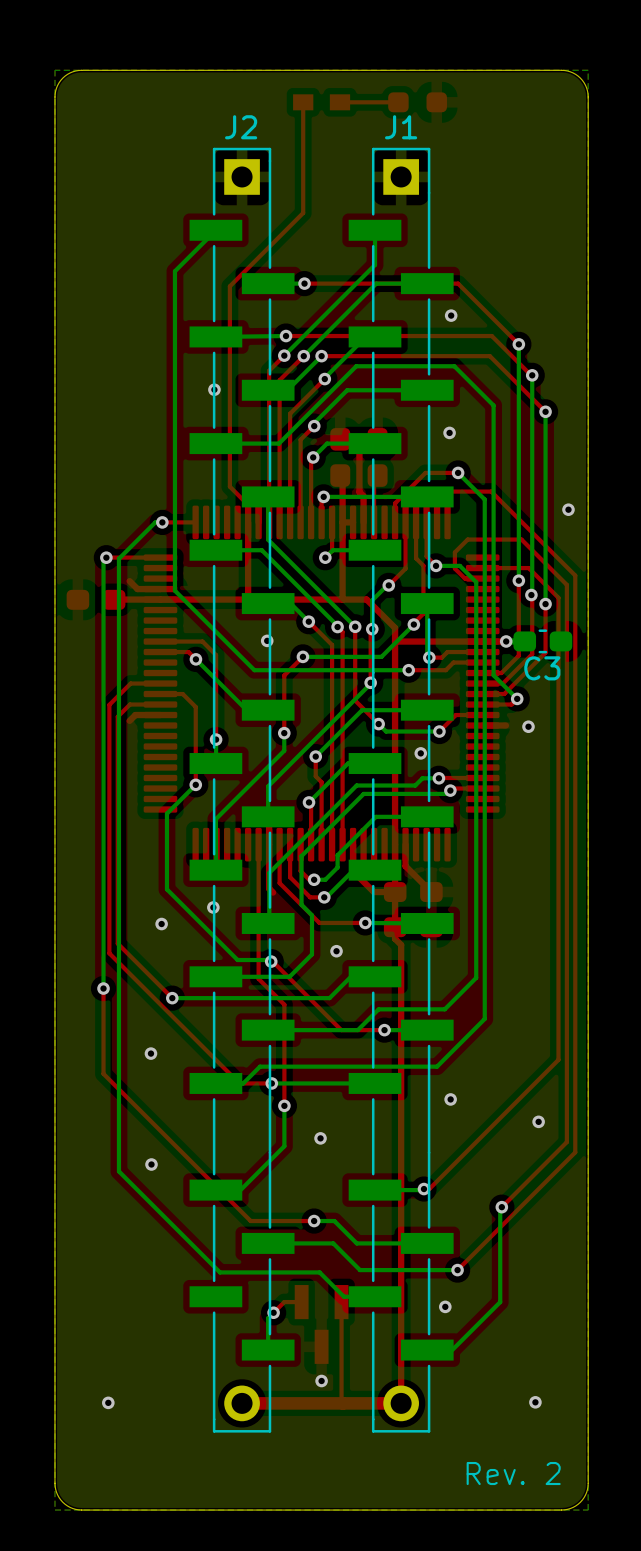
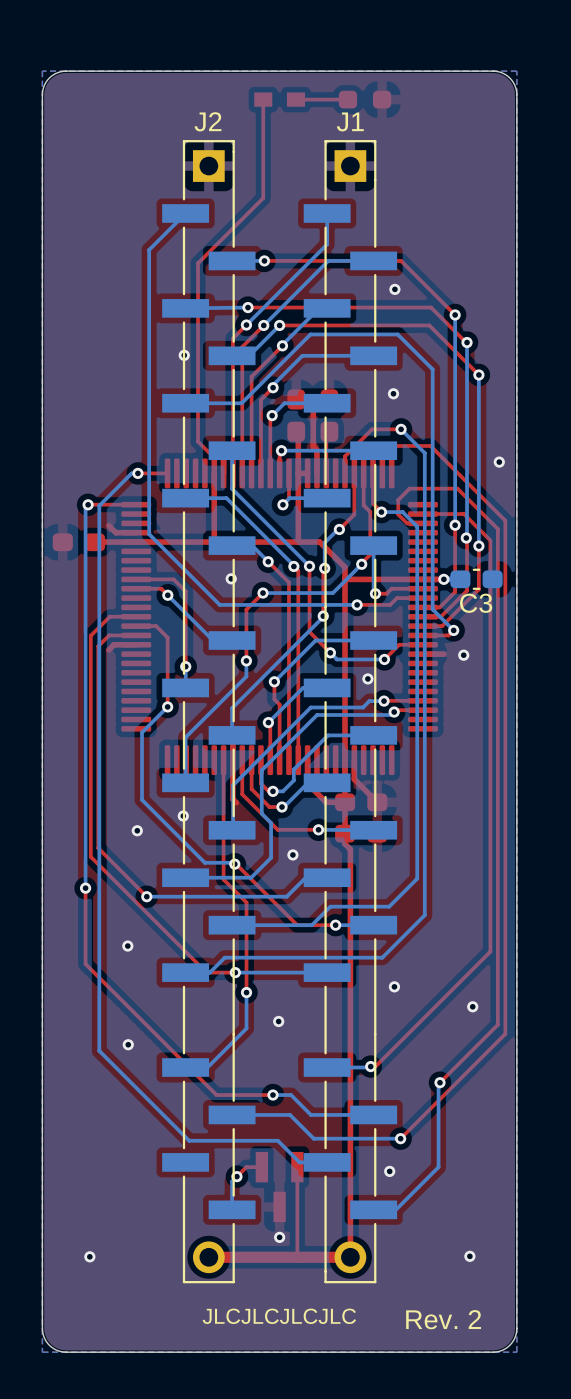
text: none -> JLCJLCJLCJLC (279, 1316)

